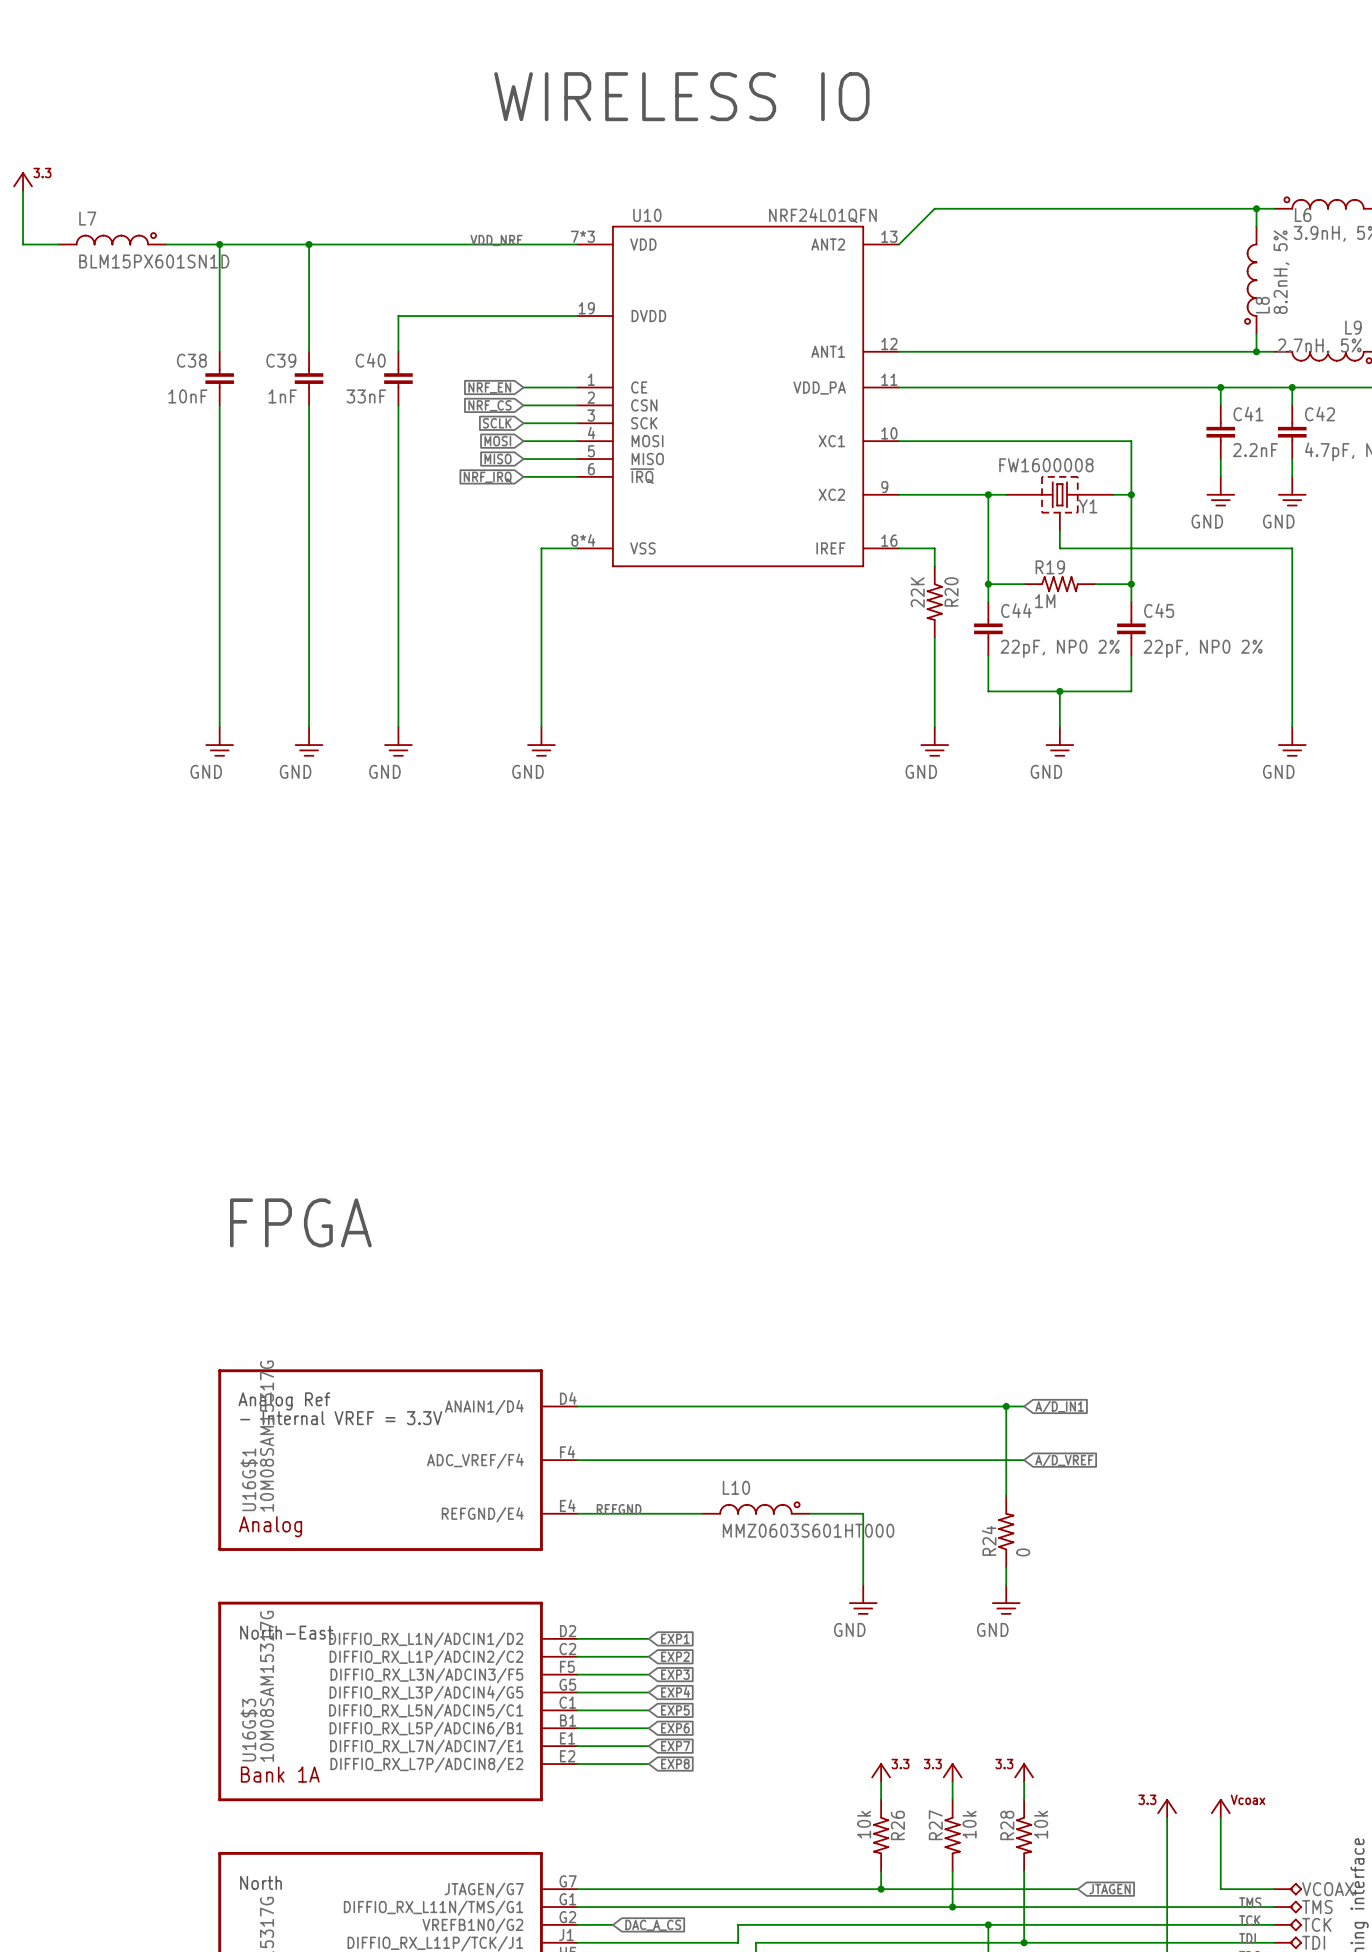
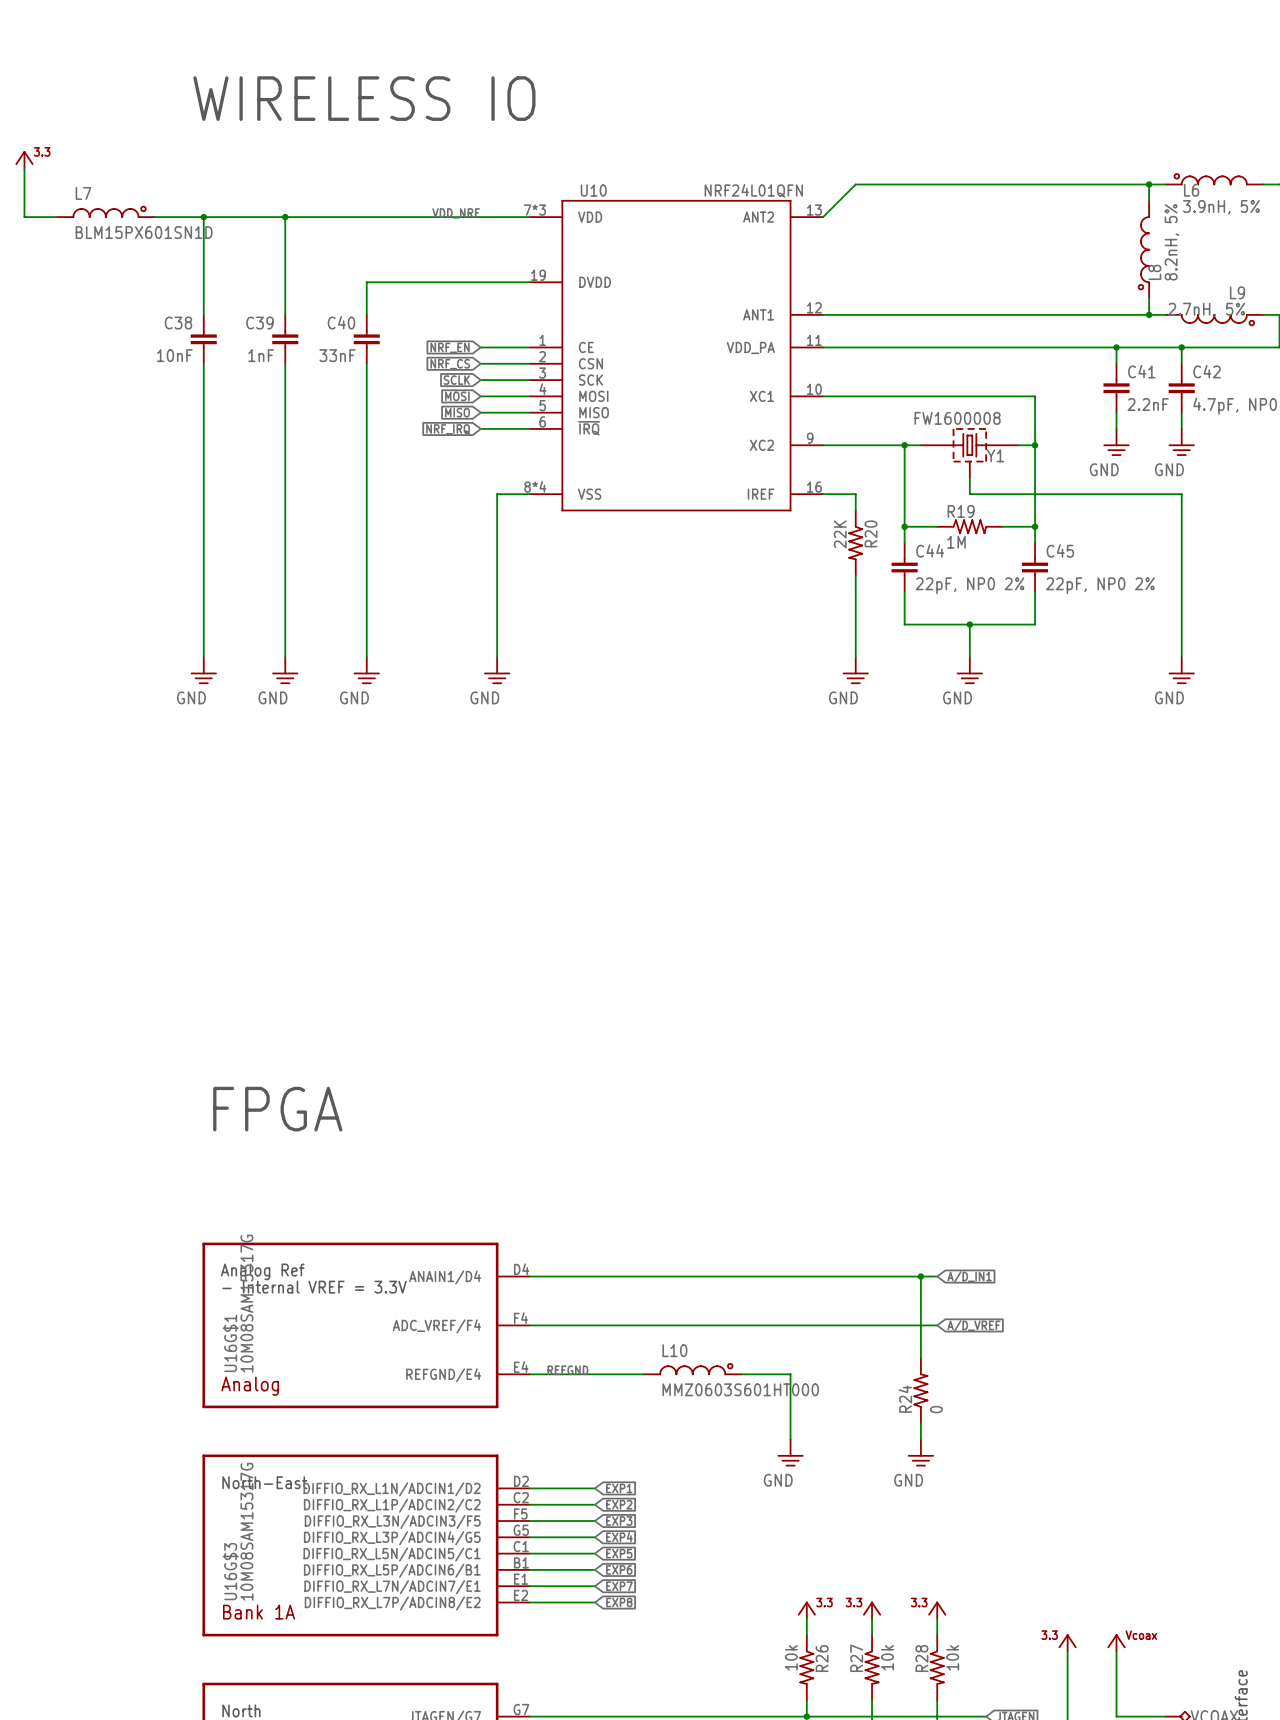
text: WIRELESS IO (681, 96) -> none
text: none -> WIRELESS IO (364, 98)

